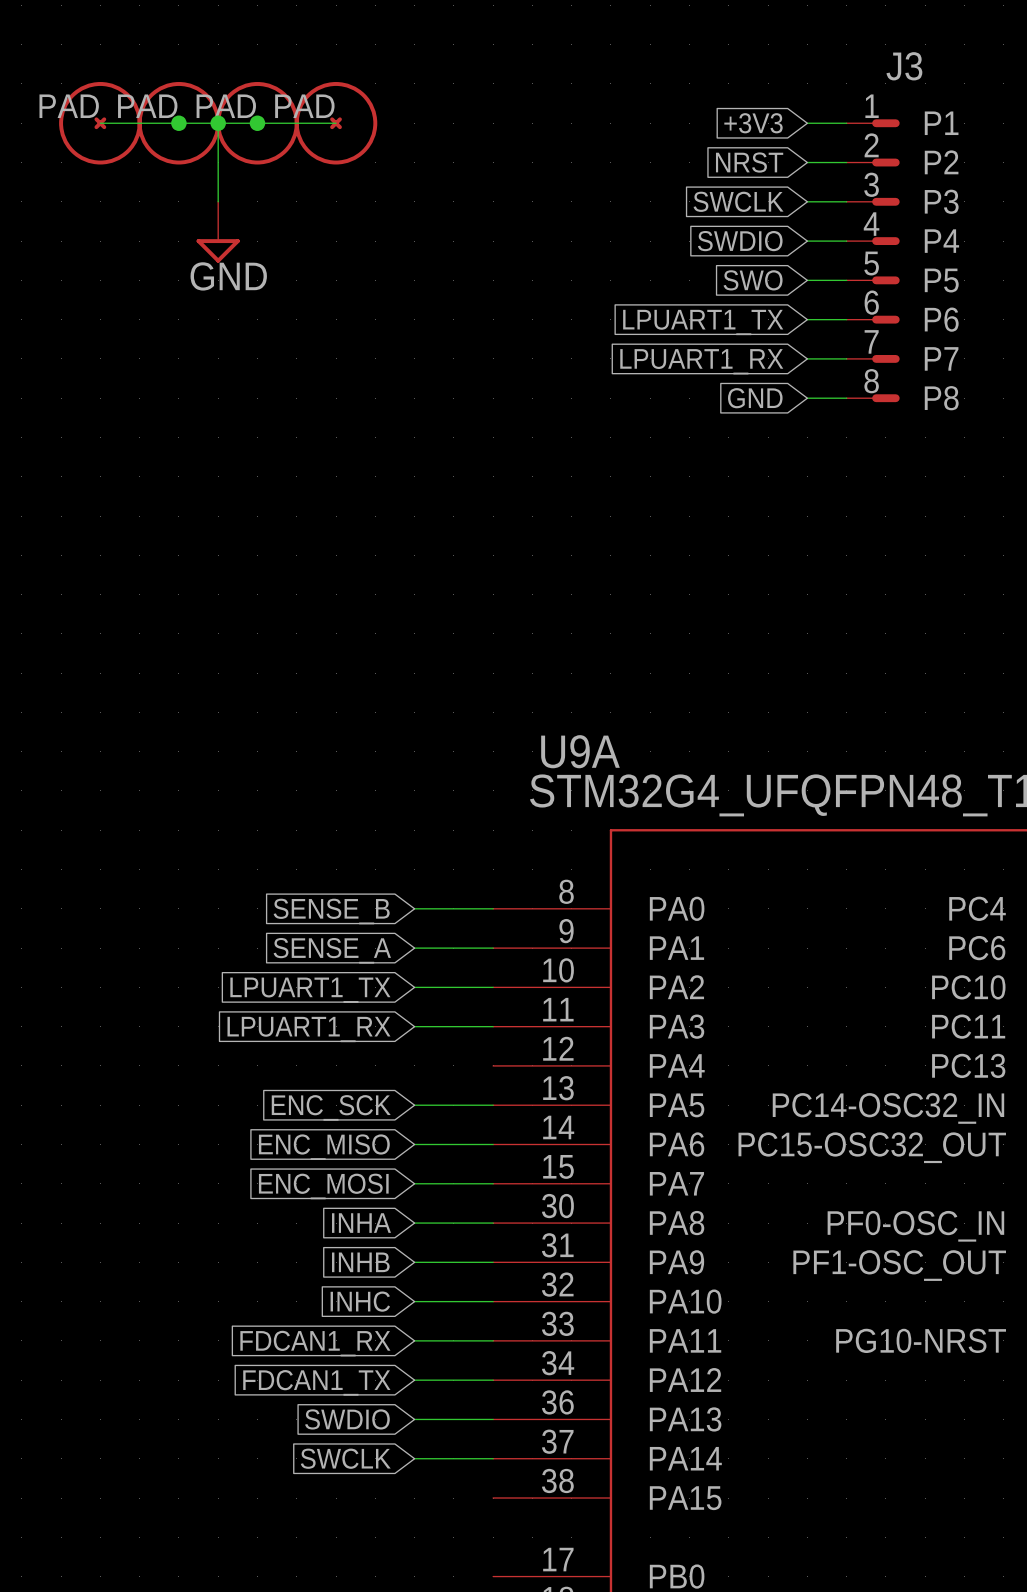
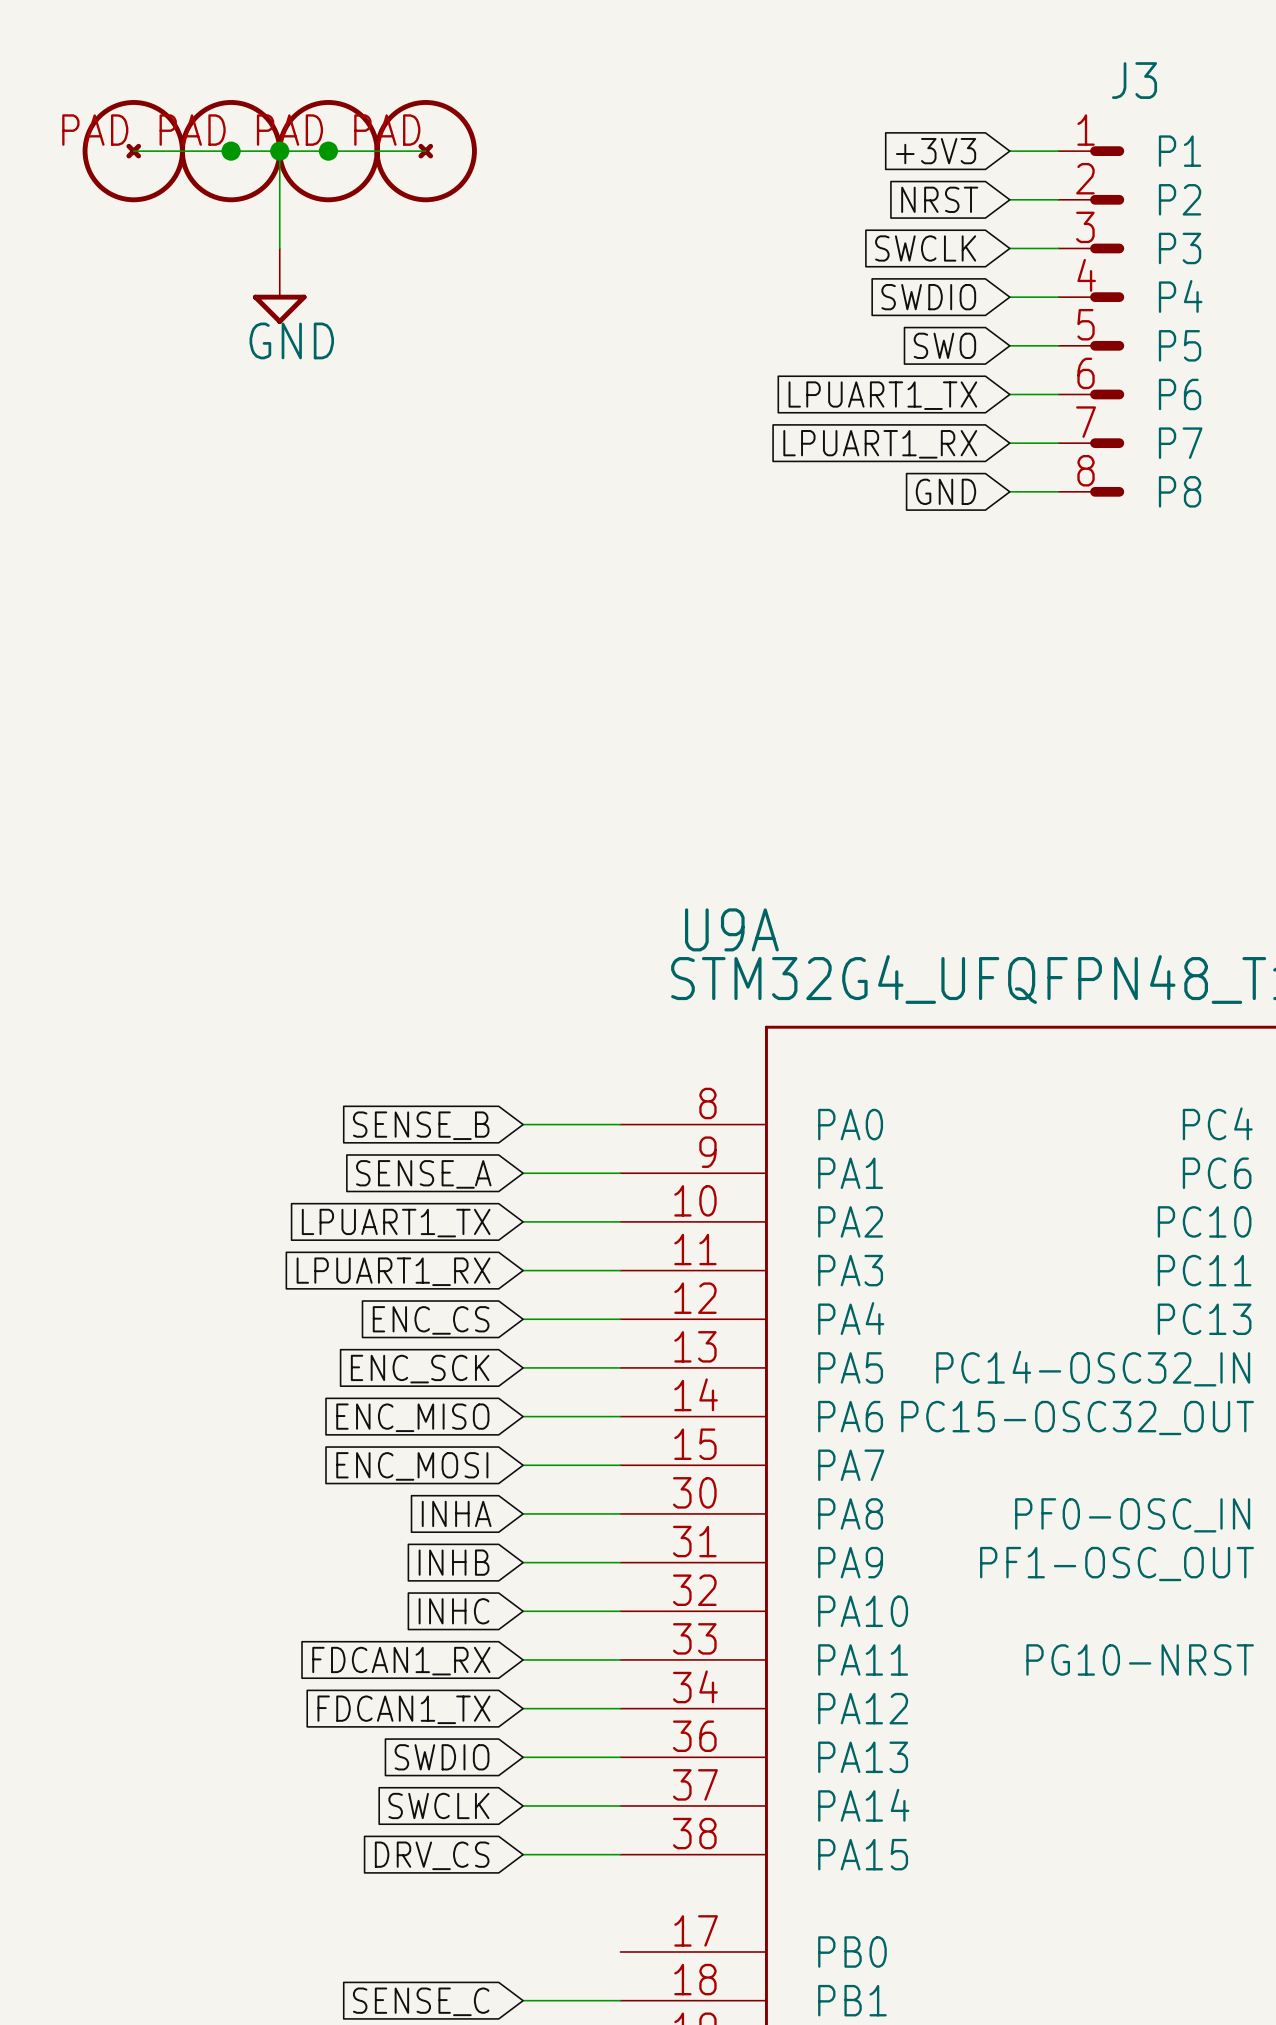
wire: none -> (523, 1319) (620, 1319)
global label: none -> ENC_CS (431, 1320)
wire: none -> (523, 1854) (620, 1854)
global label: none -> DRV_CS (432, 1855)

